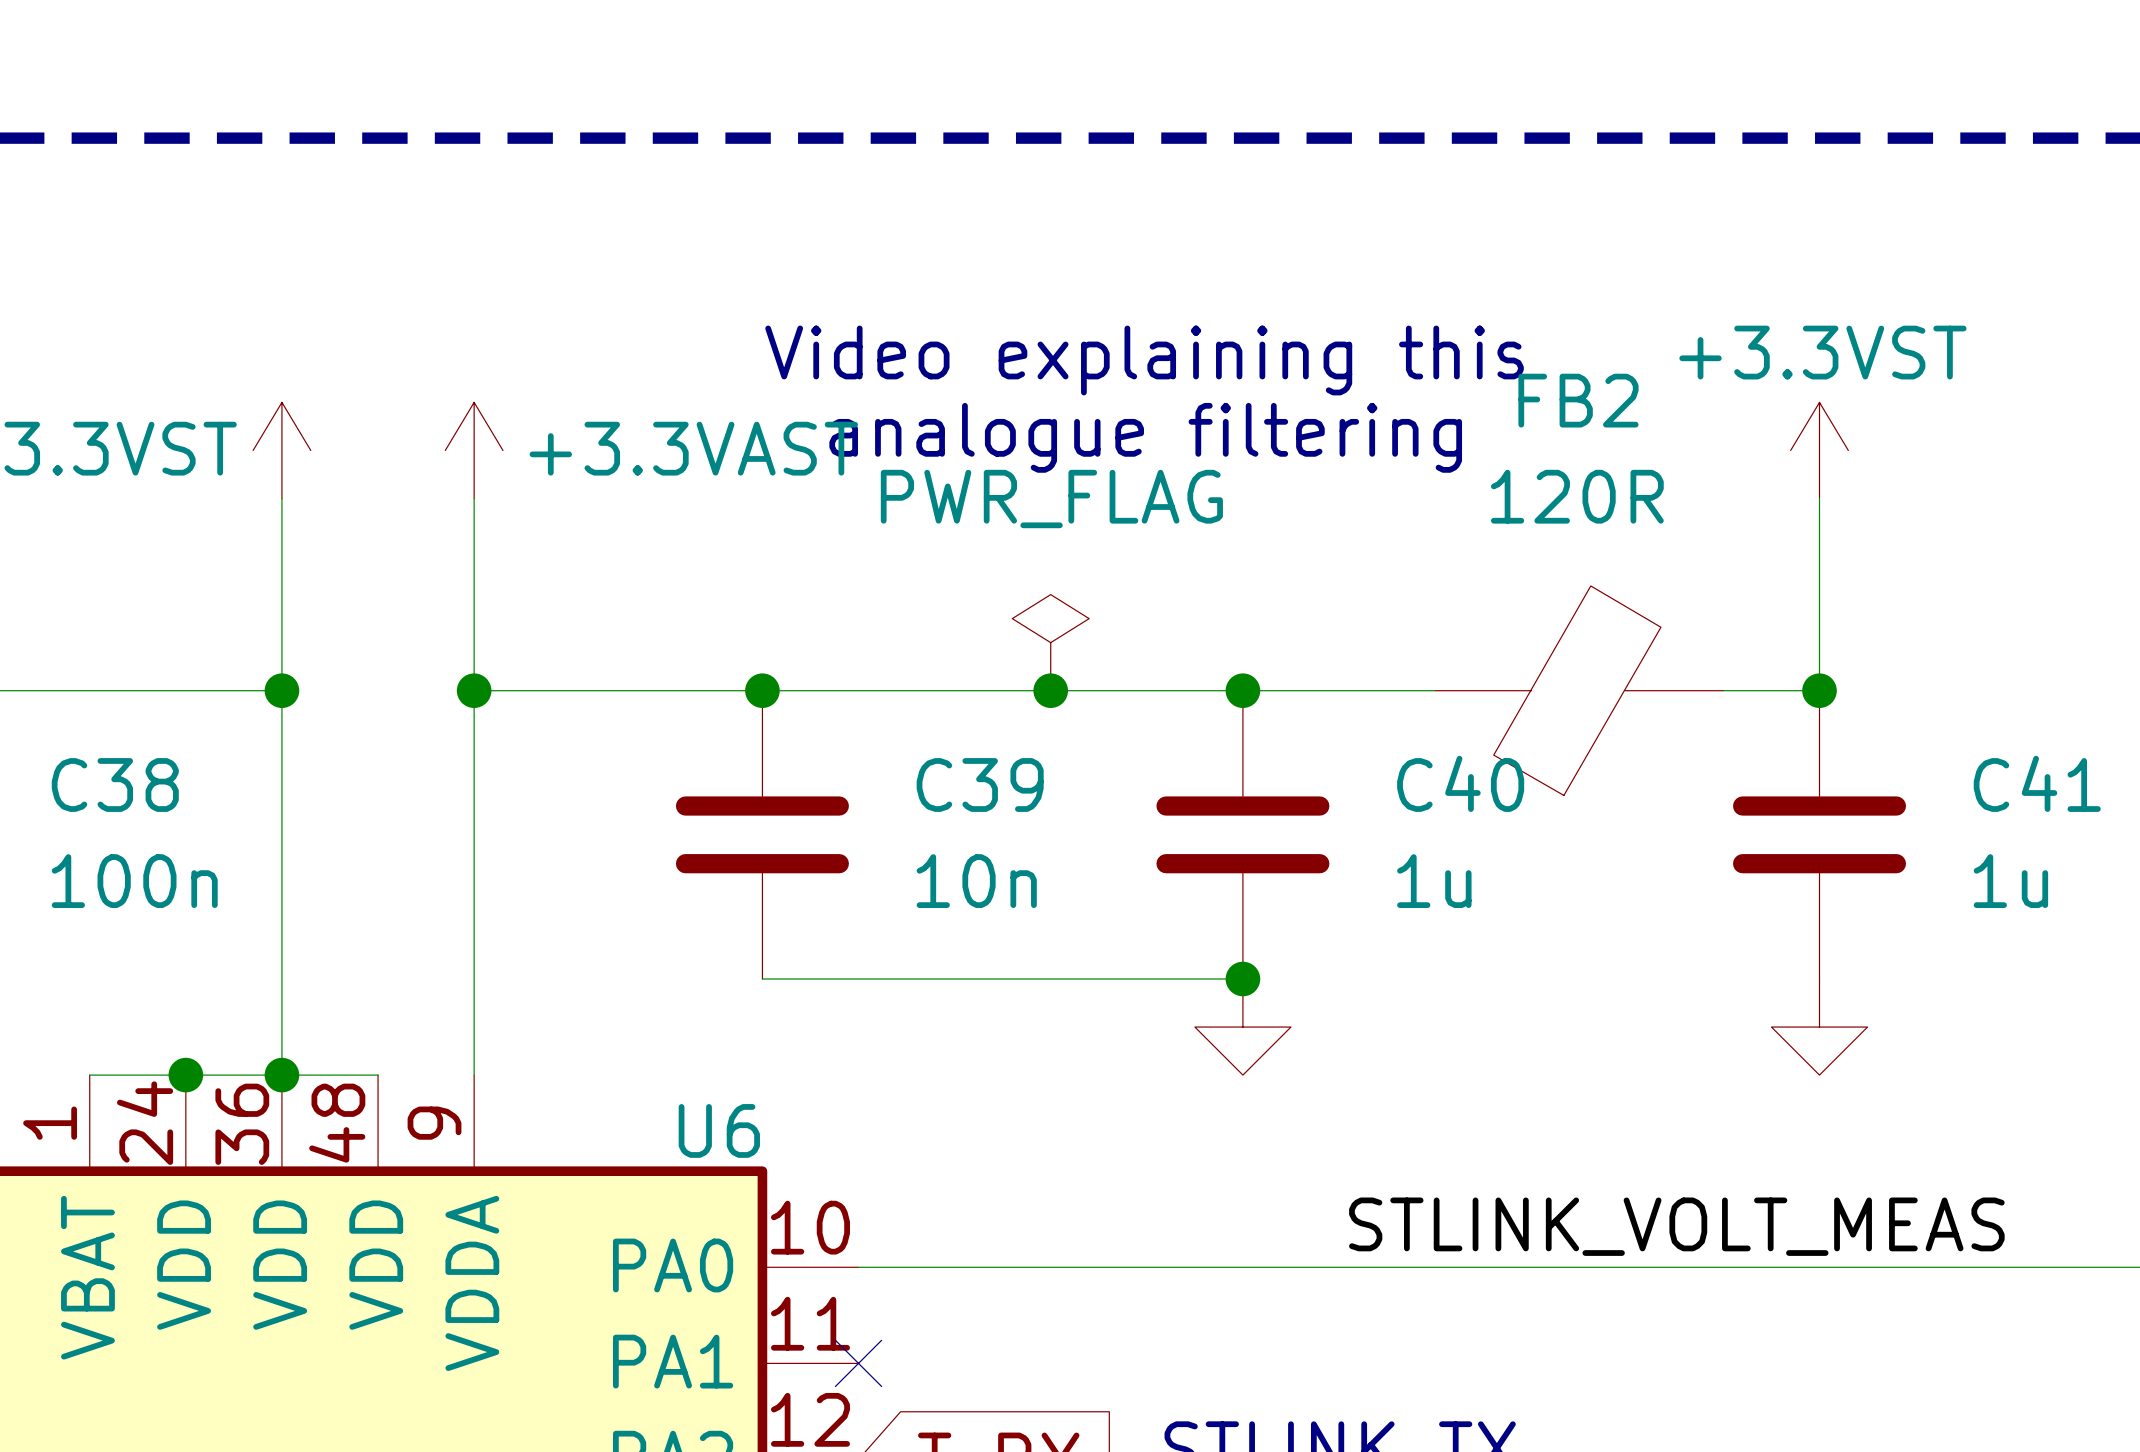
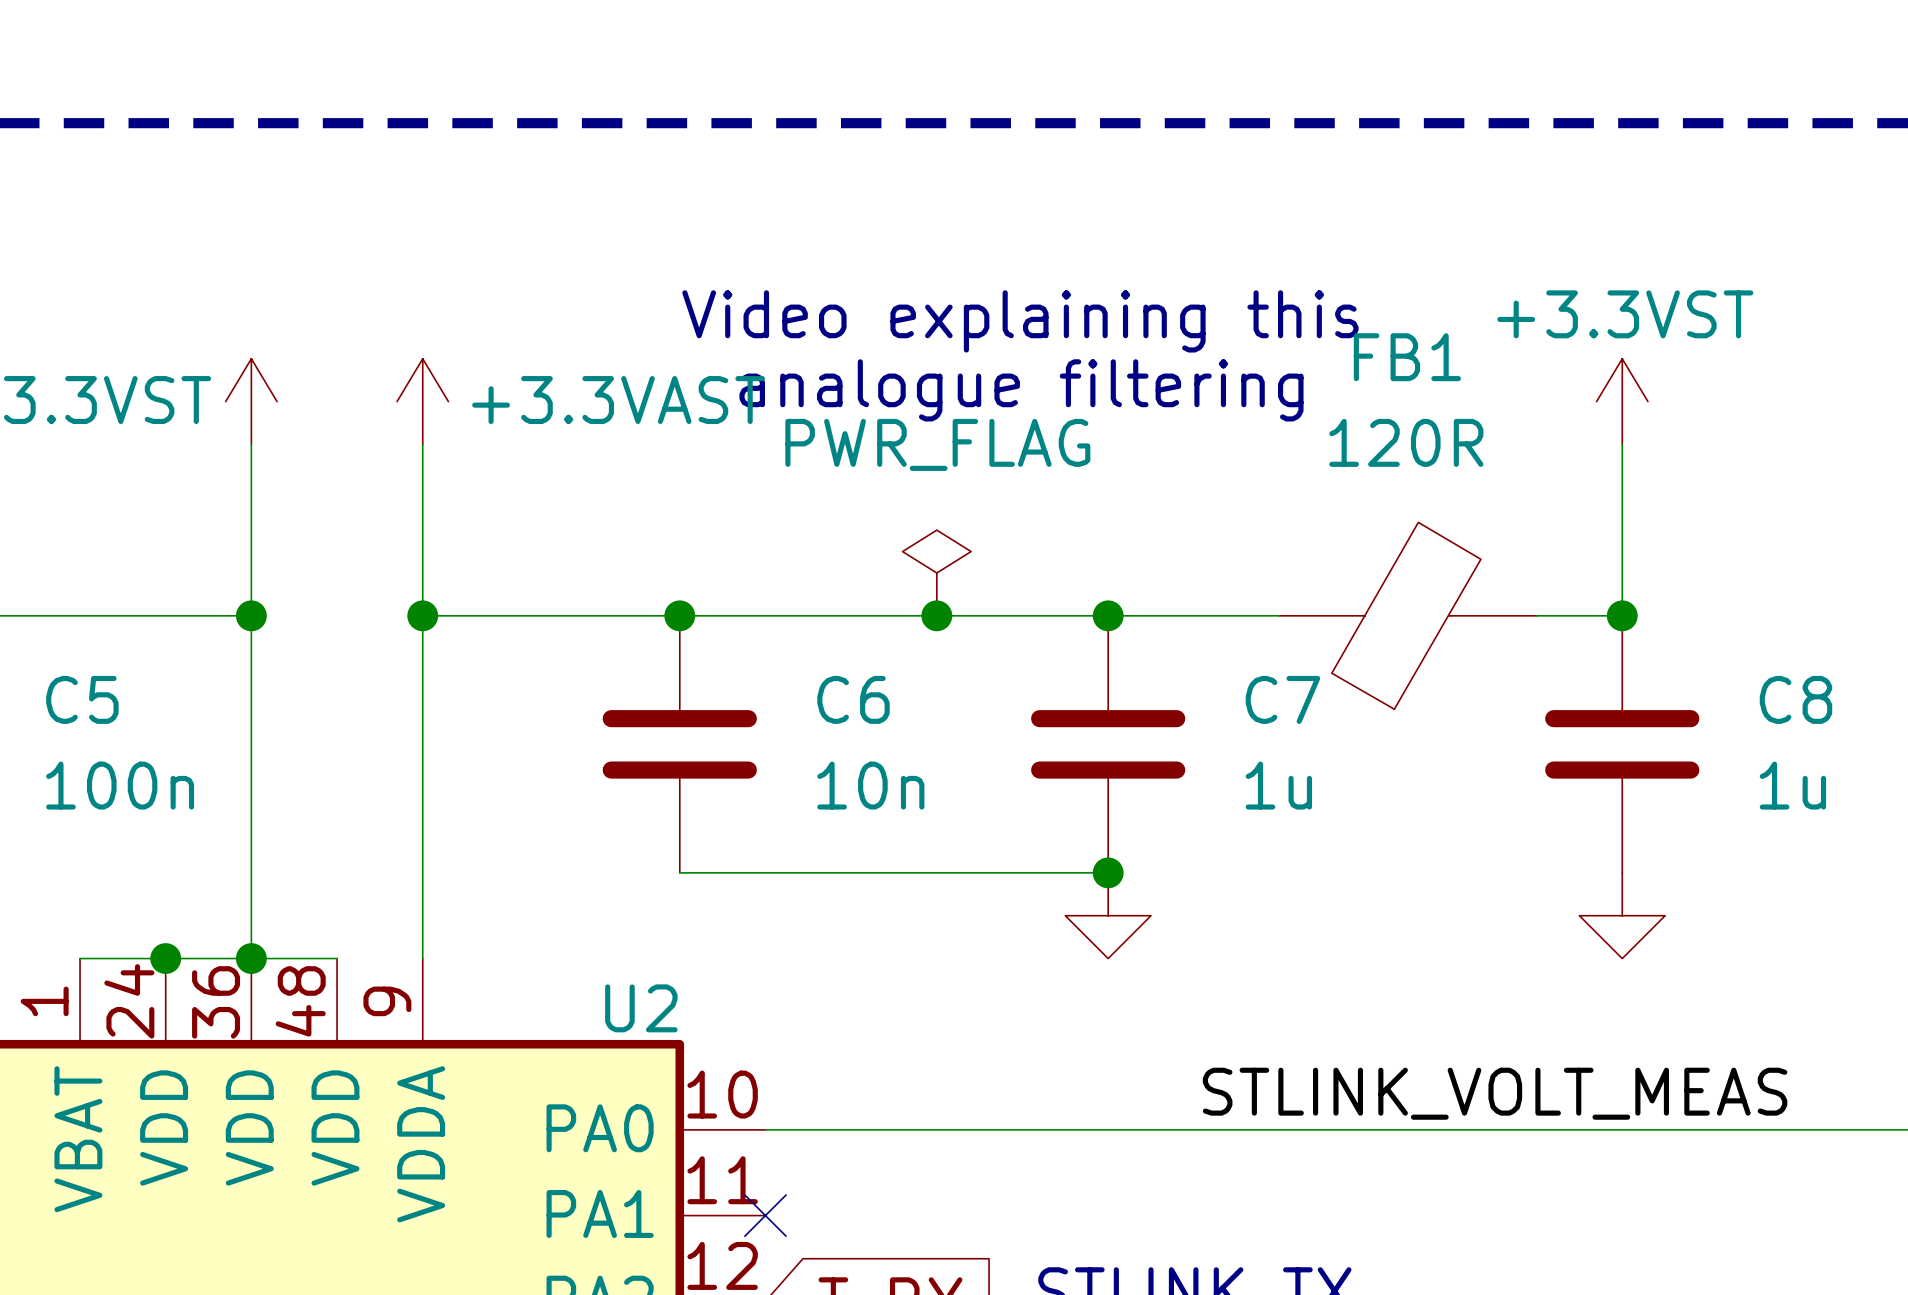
FB2 name: FB2 (1578, 400) -> FB1 (1407, 357)
C40 name: C40 (1460, 783) -> C7 (1282, 699)
C41 name: C41 (2037, 783) -> C8 (1795, 699)
C38 name: C38 (115, 785) -> C5 (82, 699)
C39 name: C39 (980, 785) -> C6 (853, 699)
U6 name: U6 (719, 1130) -> U2 (641, 1008)

